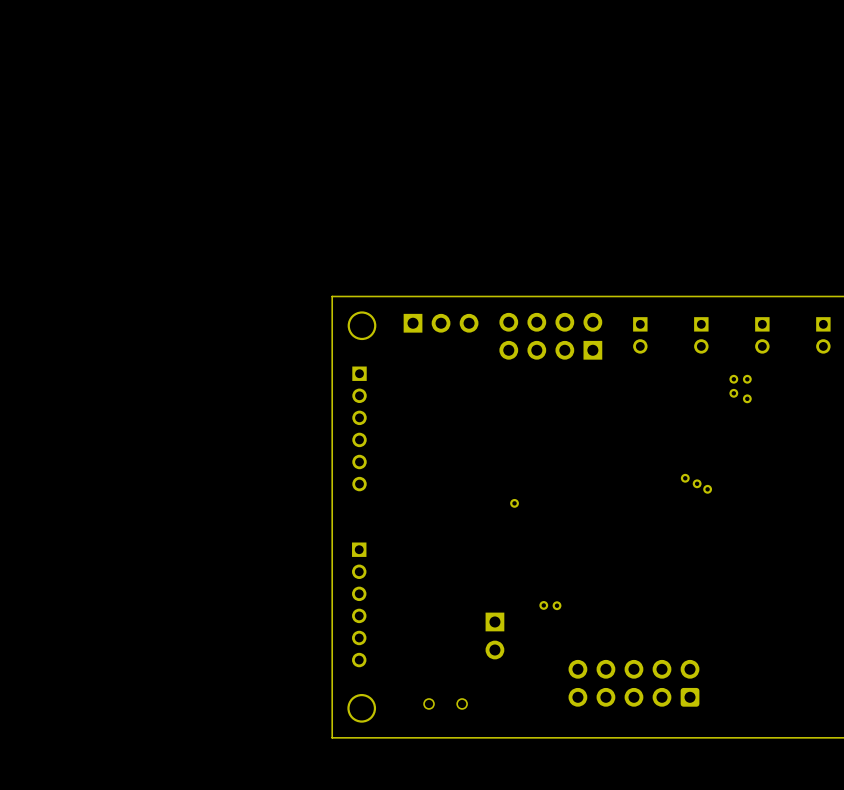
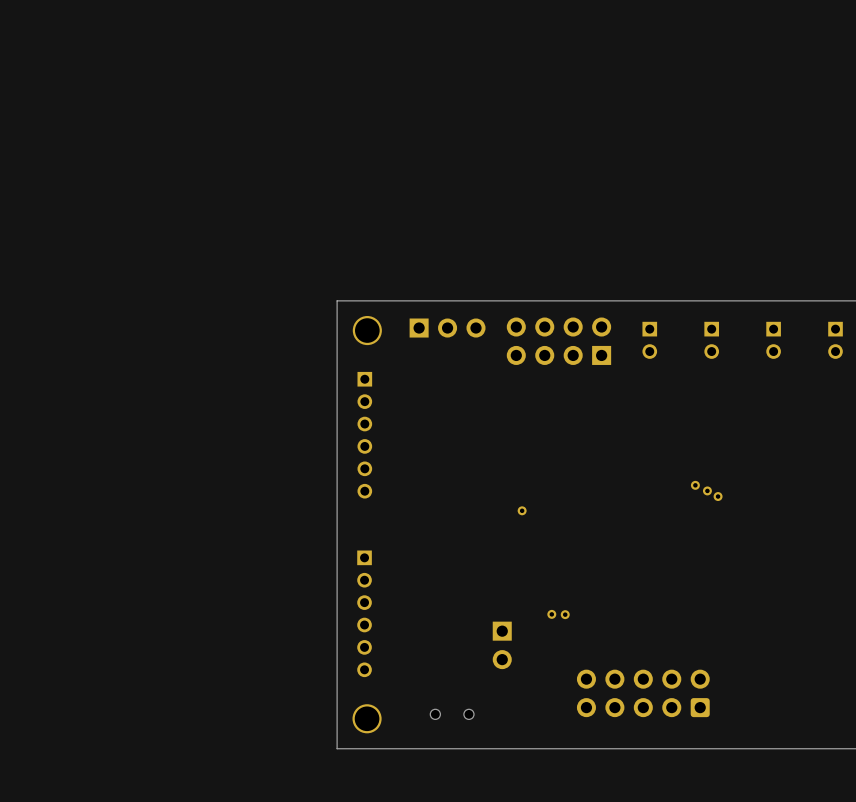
part: (733, 379) -> none
part: (747, 379) -> none
part: (733, 393) -> none
part: (747, 398) -> none

